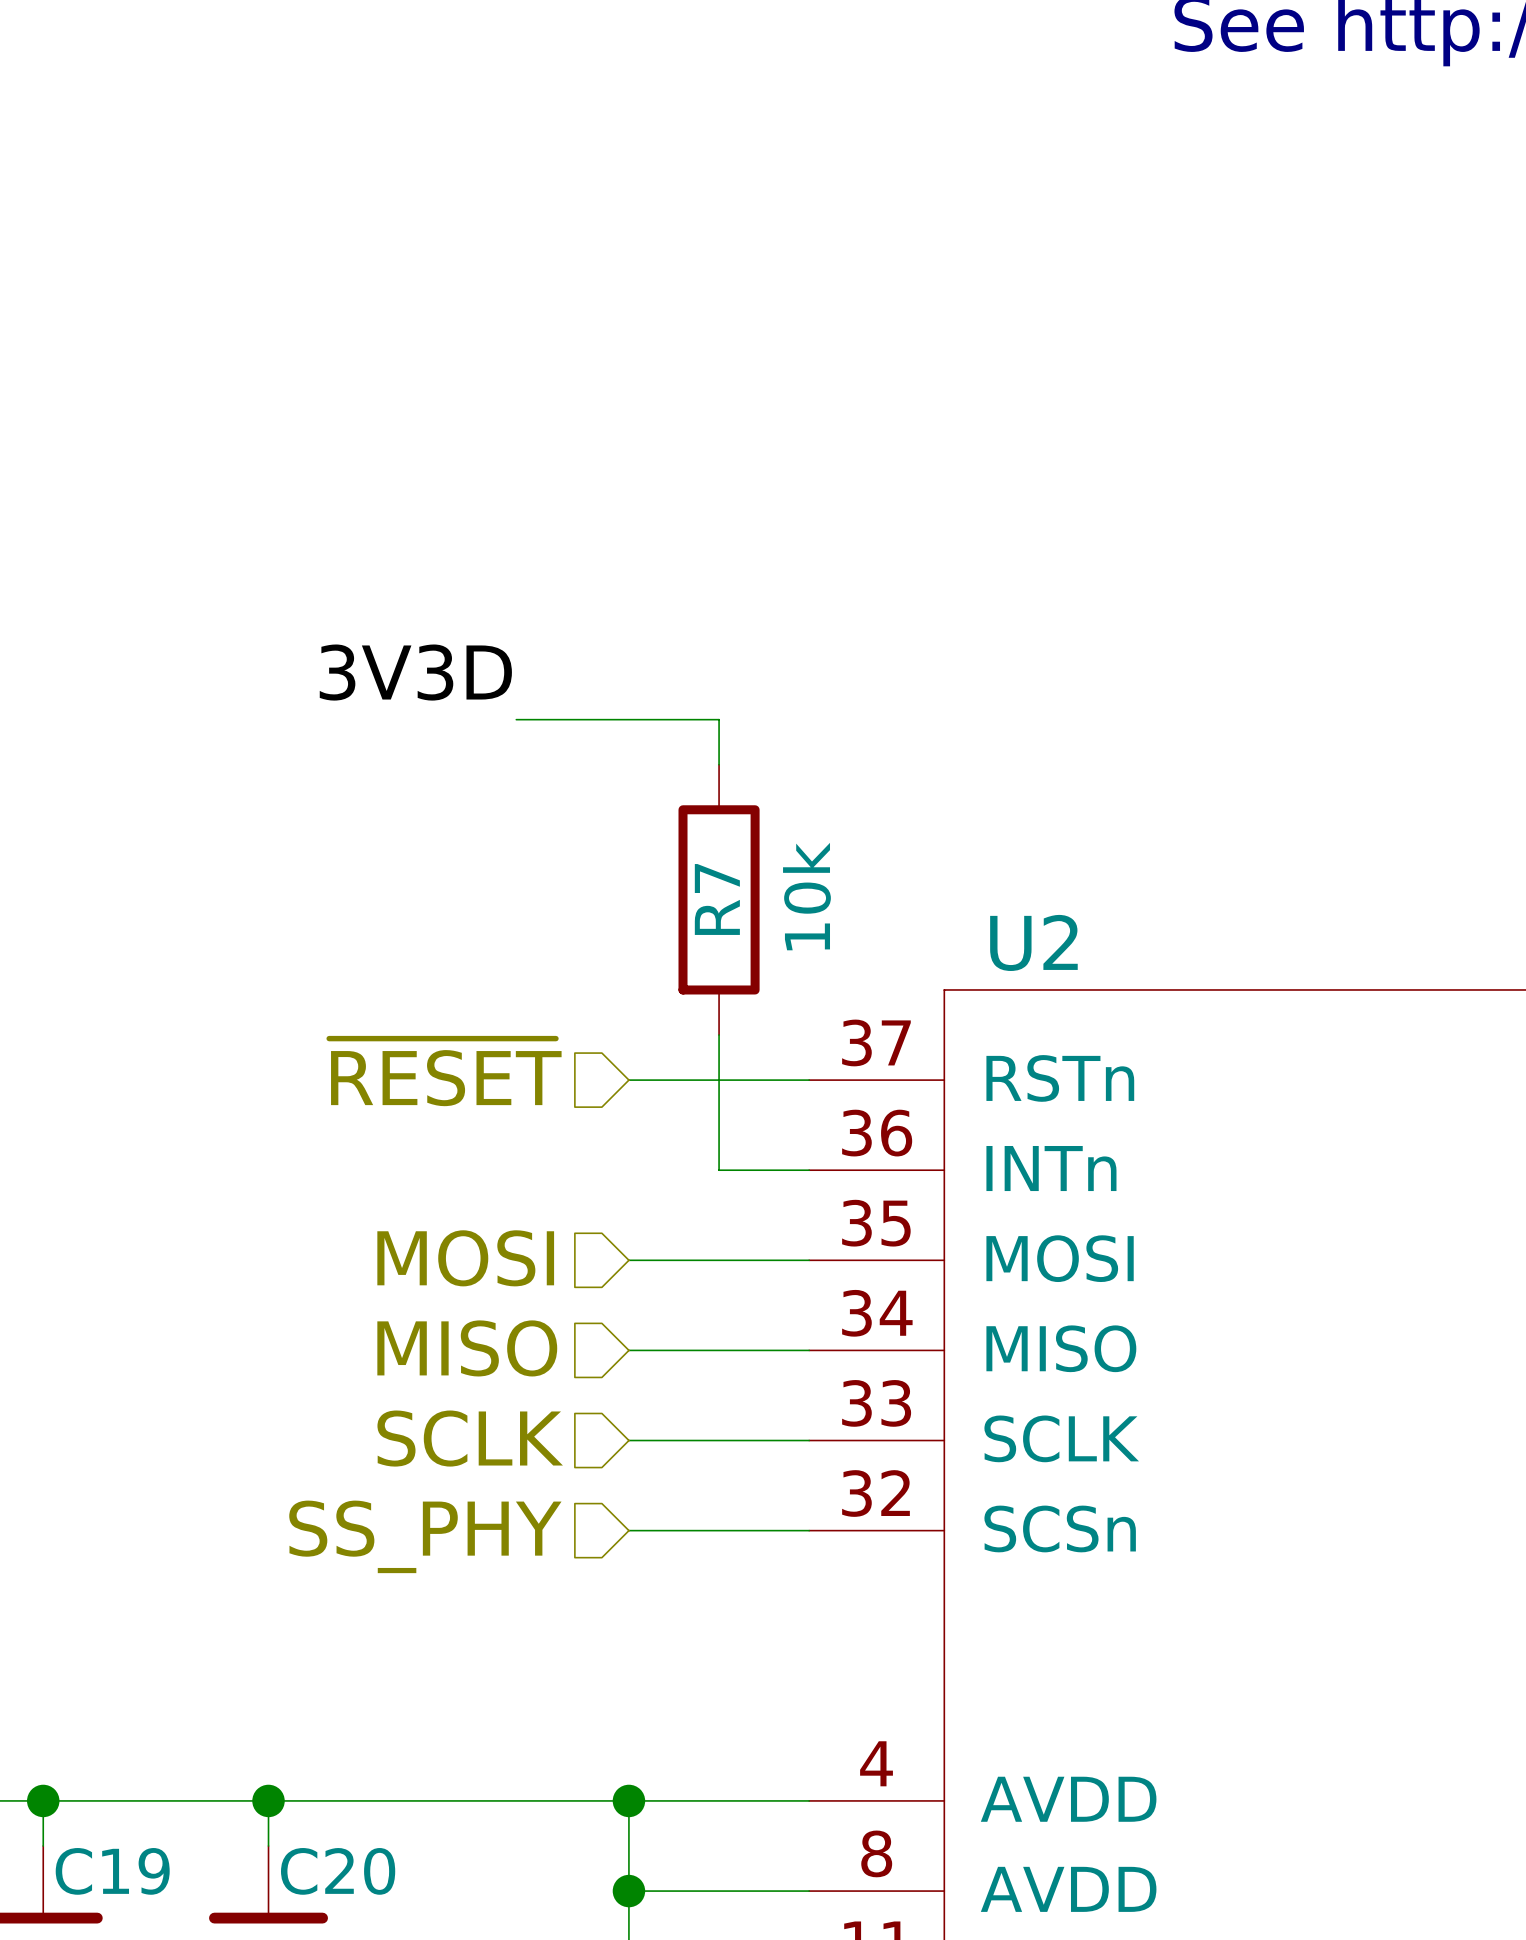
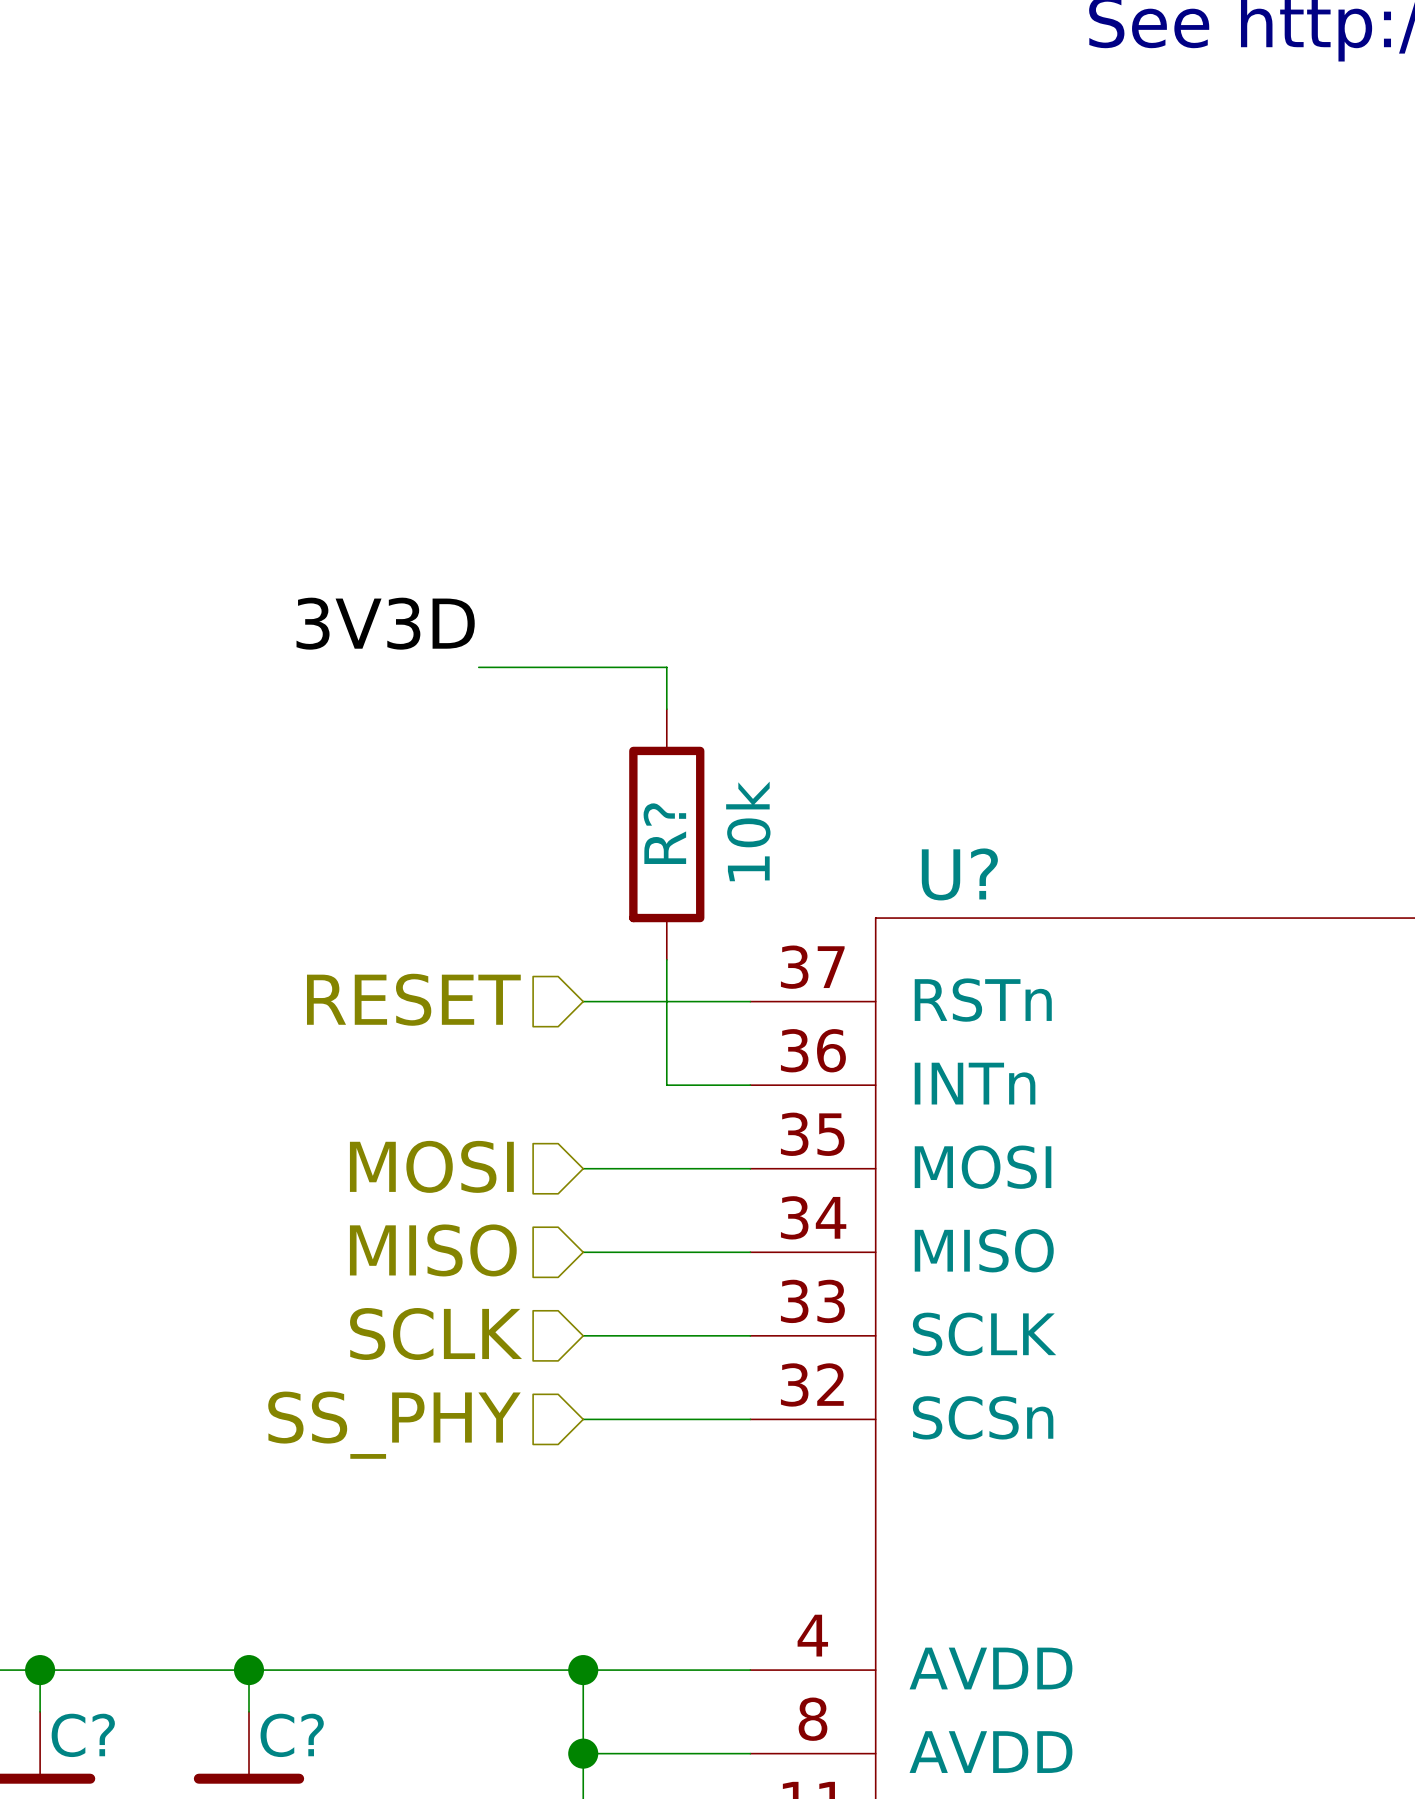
R7 name: R7 (717, 899) -> R? (664, 833)
U2 name: U2 (1033, 942) -> U? (959, 874)
hierarchical label: ~{RESET} (445, 1072) -> RESET (413, 999)
C19 name: C19 (112, 1871) -> C? (83, 1735)
C20 name: C20 (338, 1871) -> C? (292, 1735)

